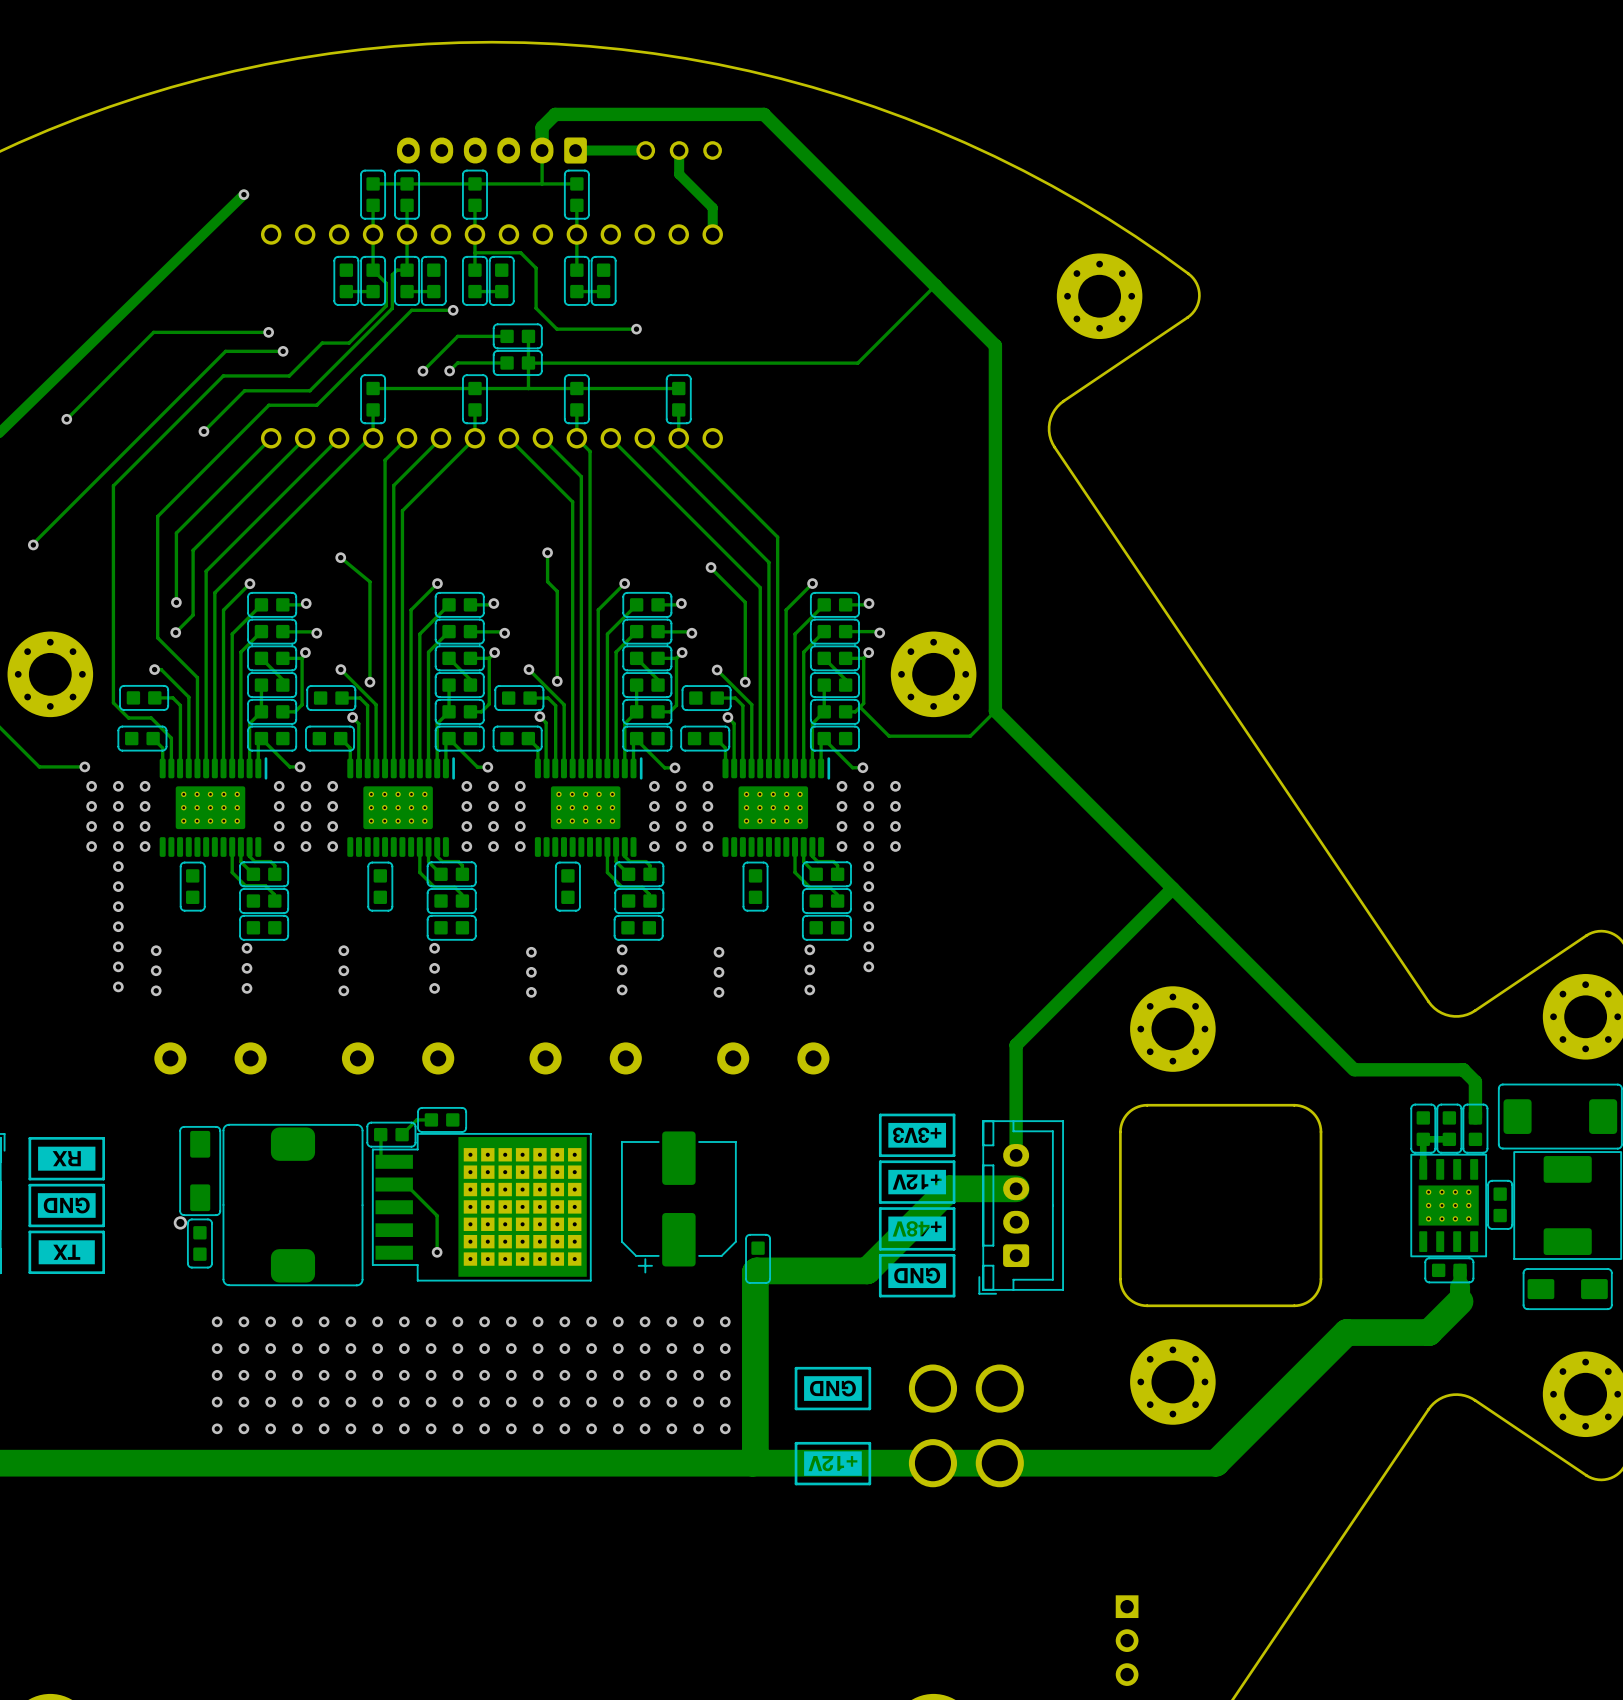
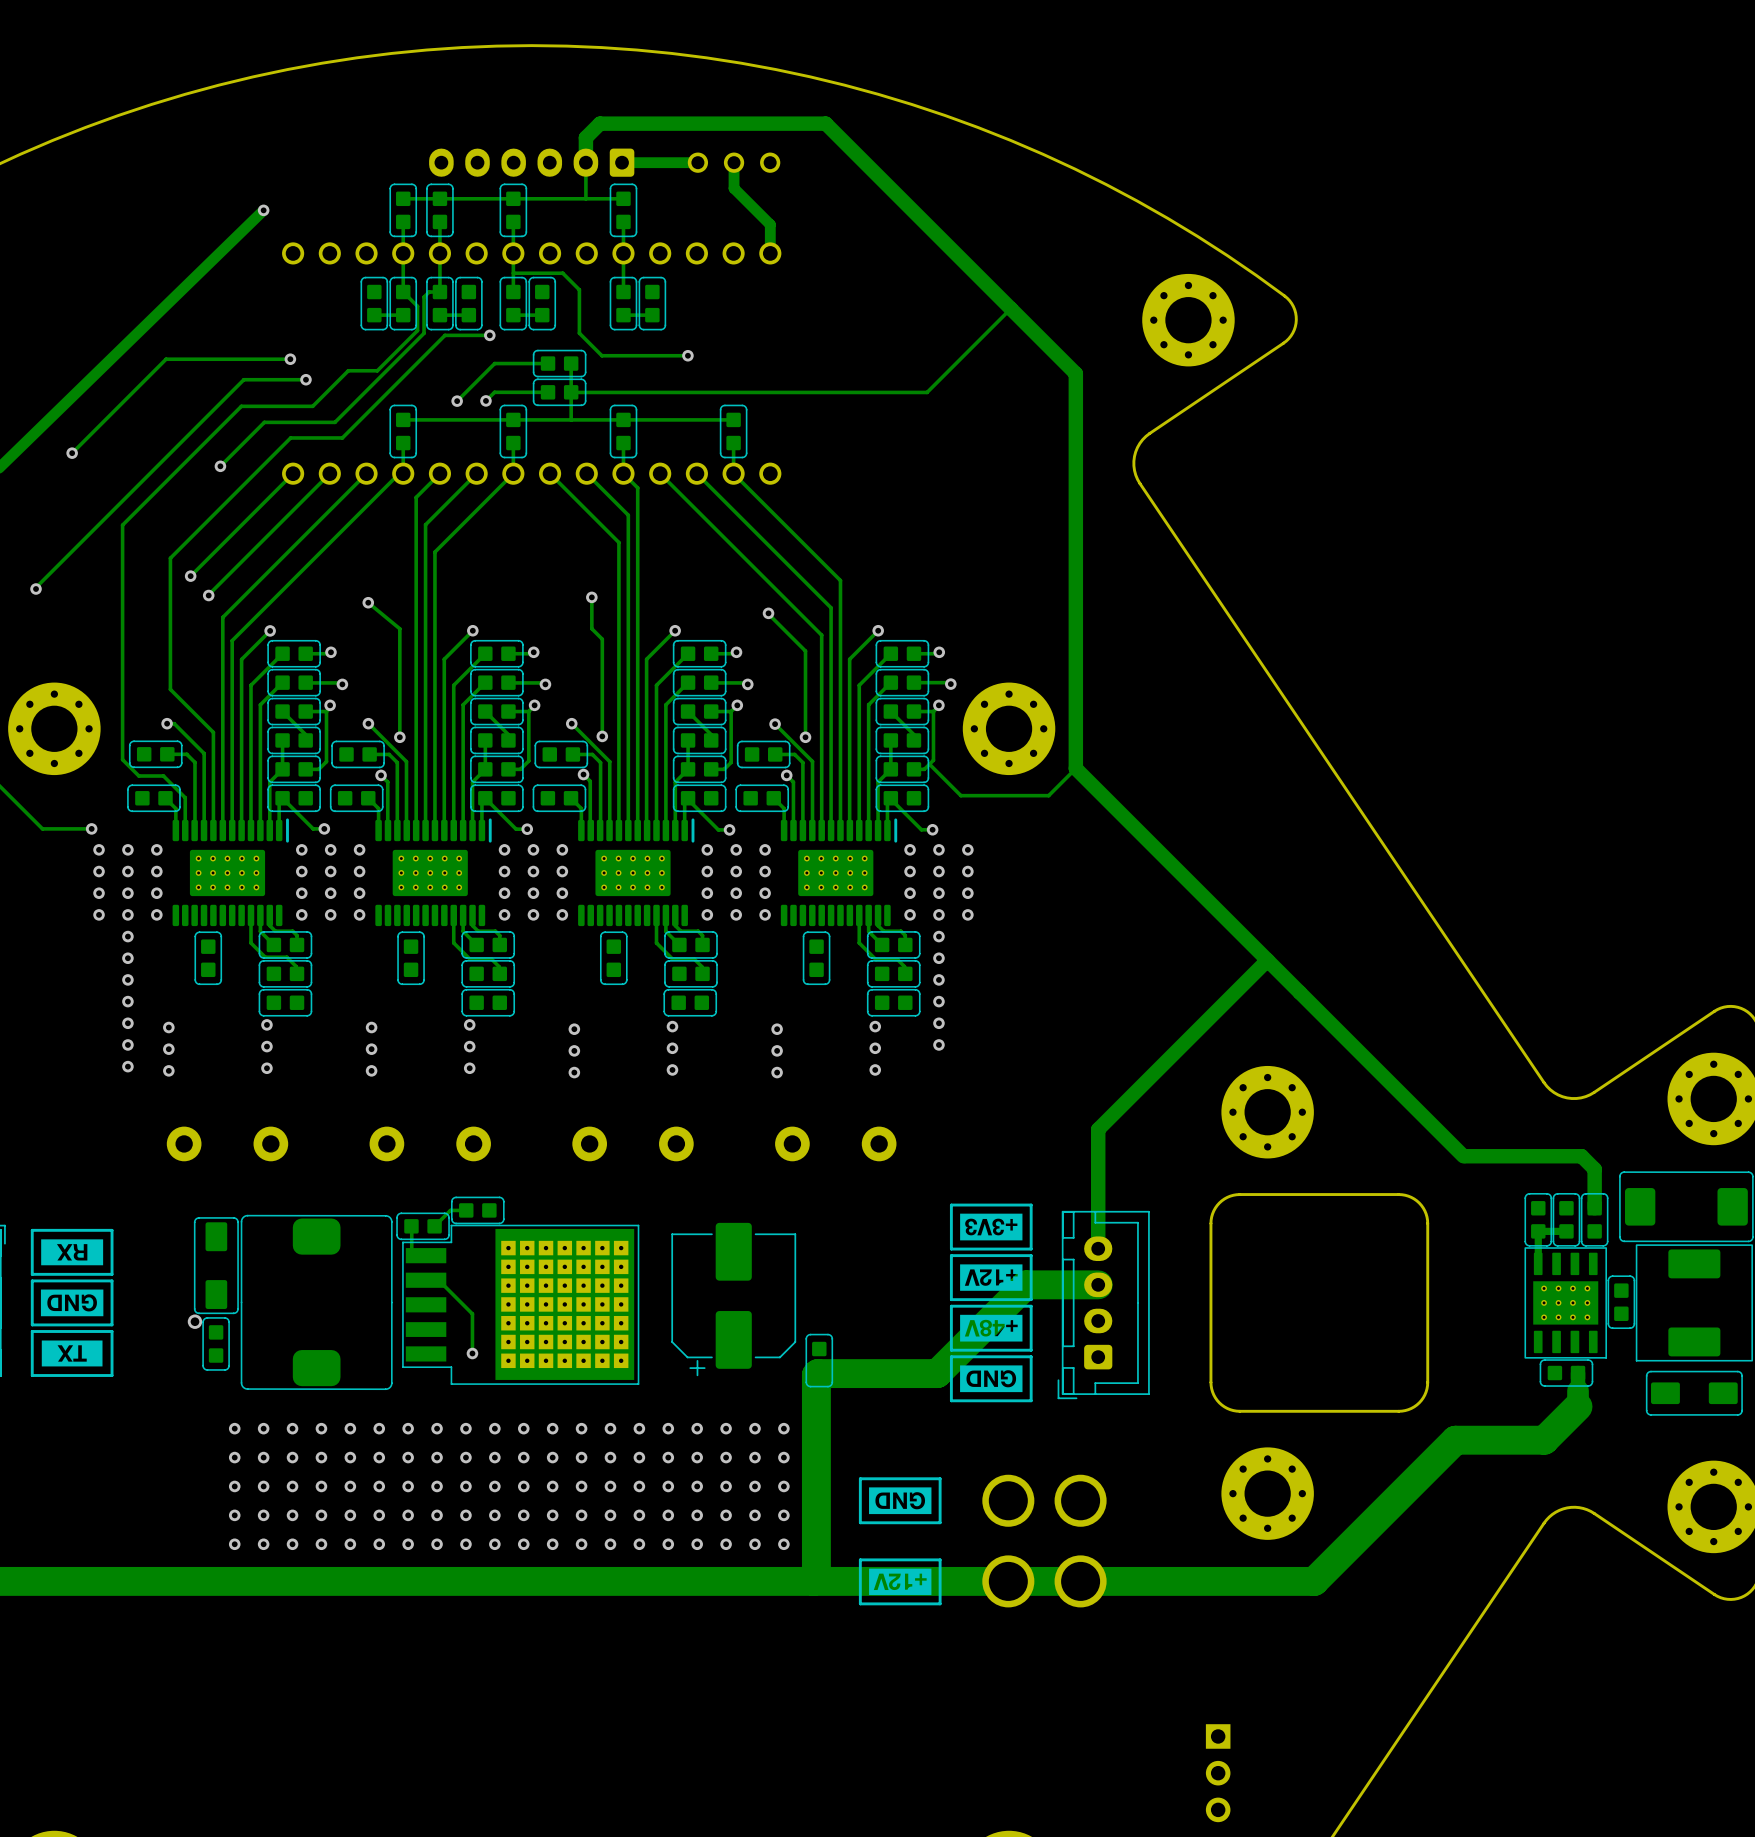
track: (176, 533) (176, 602) -> none
via: none -> (190, 576)
track: (193, 550) (193, 615) (175, 632) -> none
via: none -> (208, 595)
via: (176, 602) -> none
via: (175, 632) -> none

